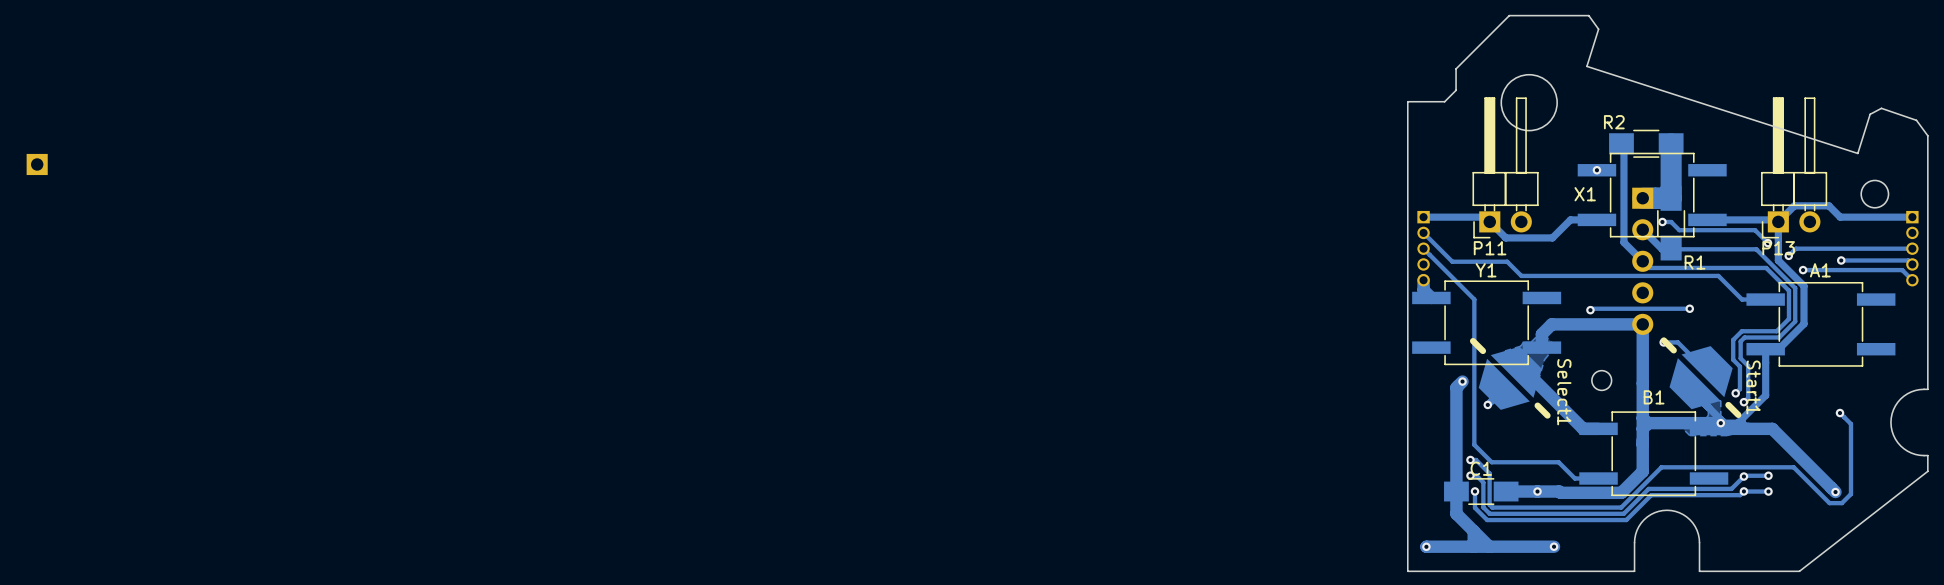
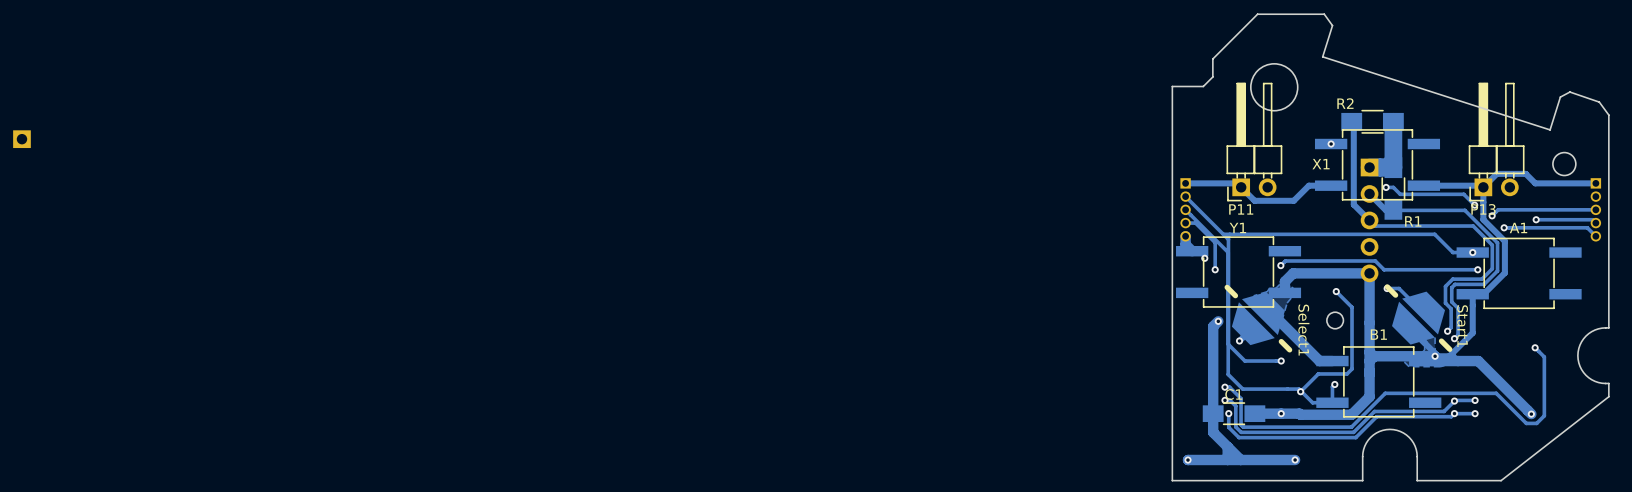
track: (1452, 261) (1507, 261) (1521, 275) (1718, 275) (1720, 277) -> (1223, 234) (1434, 234)
track: none -> (1209, 220) (1228, 239)
track: none -> (1185, 223) (1195, 223) (1215, 242) (1215, 269)
track: none -> (1229, 234) (1228, 344) (1244, 361) (1281, 361)
via: none -> (1472, 252)
via: none -> (1204, 258)
track: (1689, 308) (1590, 310) -> none
via: (1689, 308) -> none
via: (1590, 310) -> none
track: none -> (1280, 265) (1285, 260) (1375, 260) (1384, 269) (1477, 269)
via: none -> (1280, 265)
via: none -> (1215, 269)
via: none -> (1477, 269)
track: none -> (1336, 291) (1352, 307) (1352, 369) (1347, 373) (1318, 373) (1300, 391)
via: none -> (1336, 291)
via: none -> (1281, 361)
track: none -> (1334, 384) (1332, 386) (1332, 402)
via: none -> (1334, 384)
via: none -> (1300, 391)

